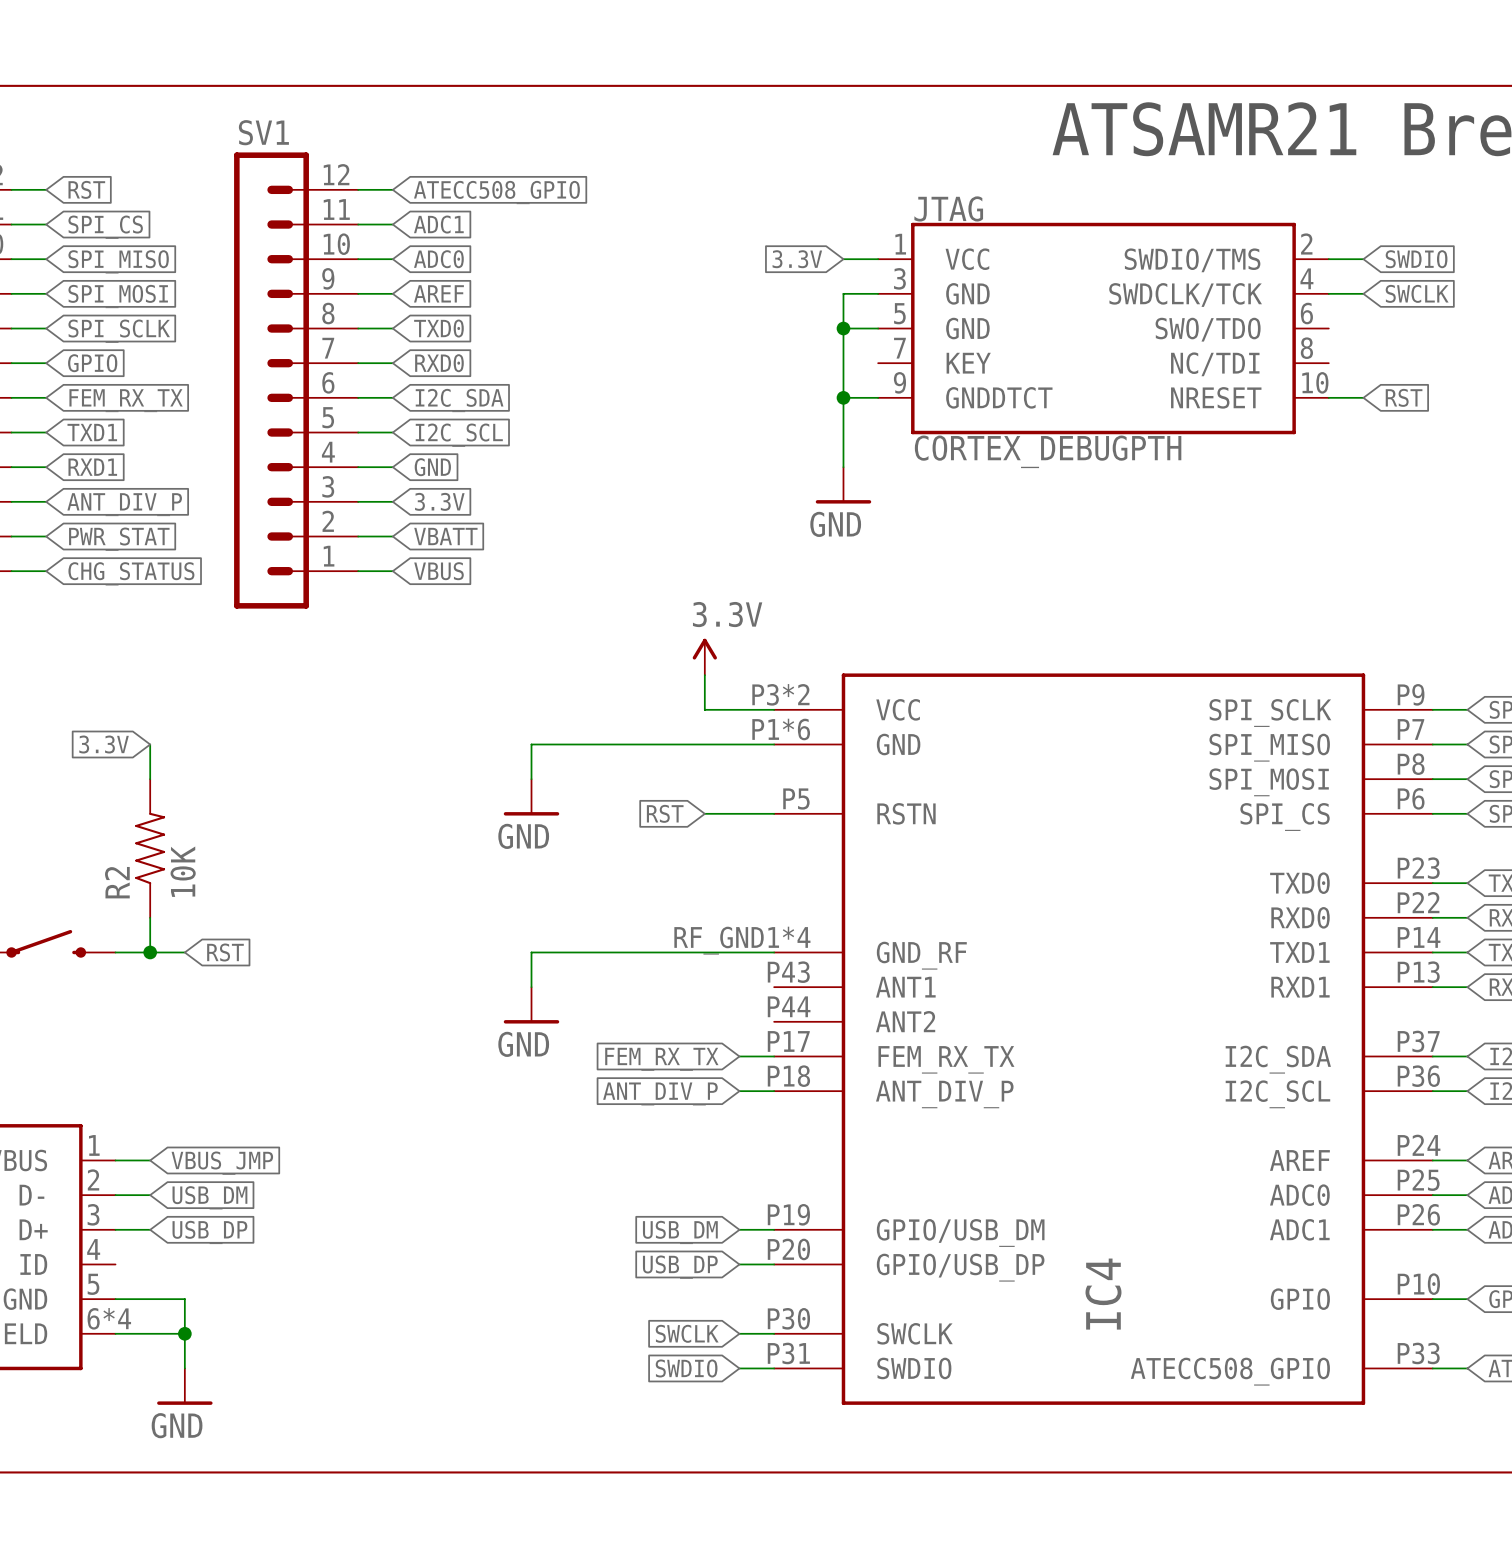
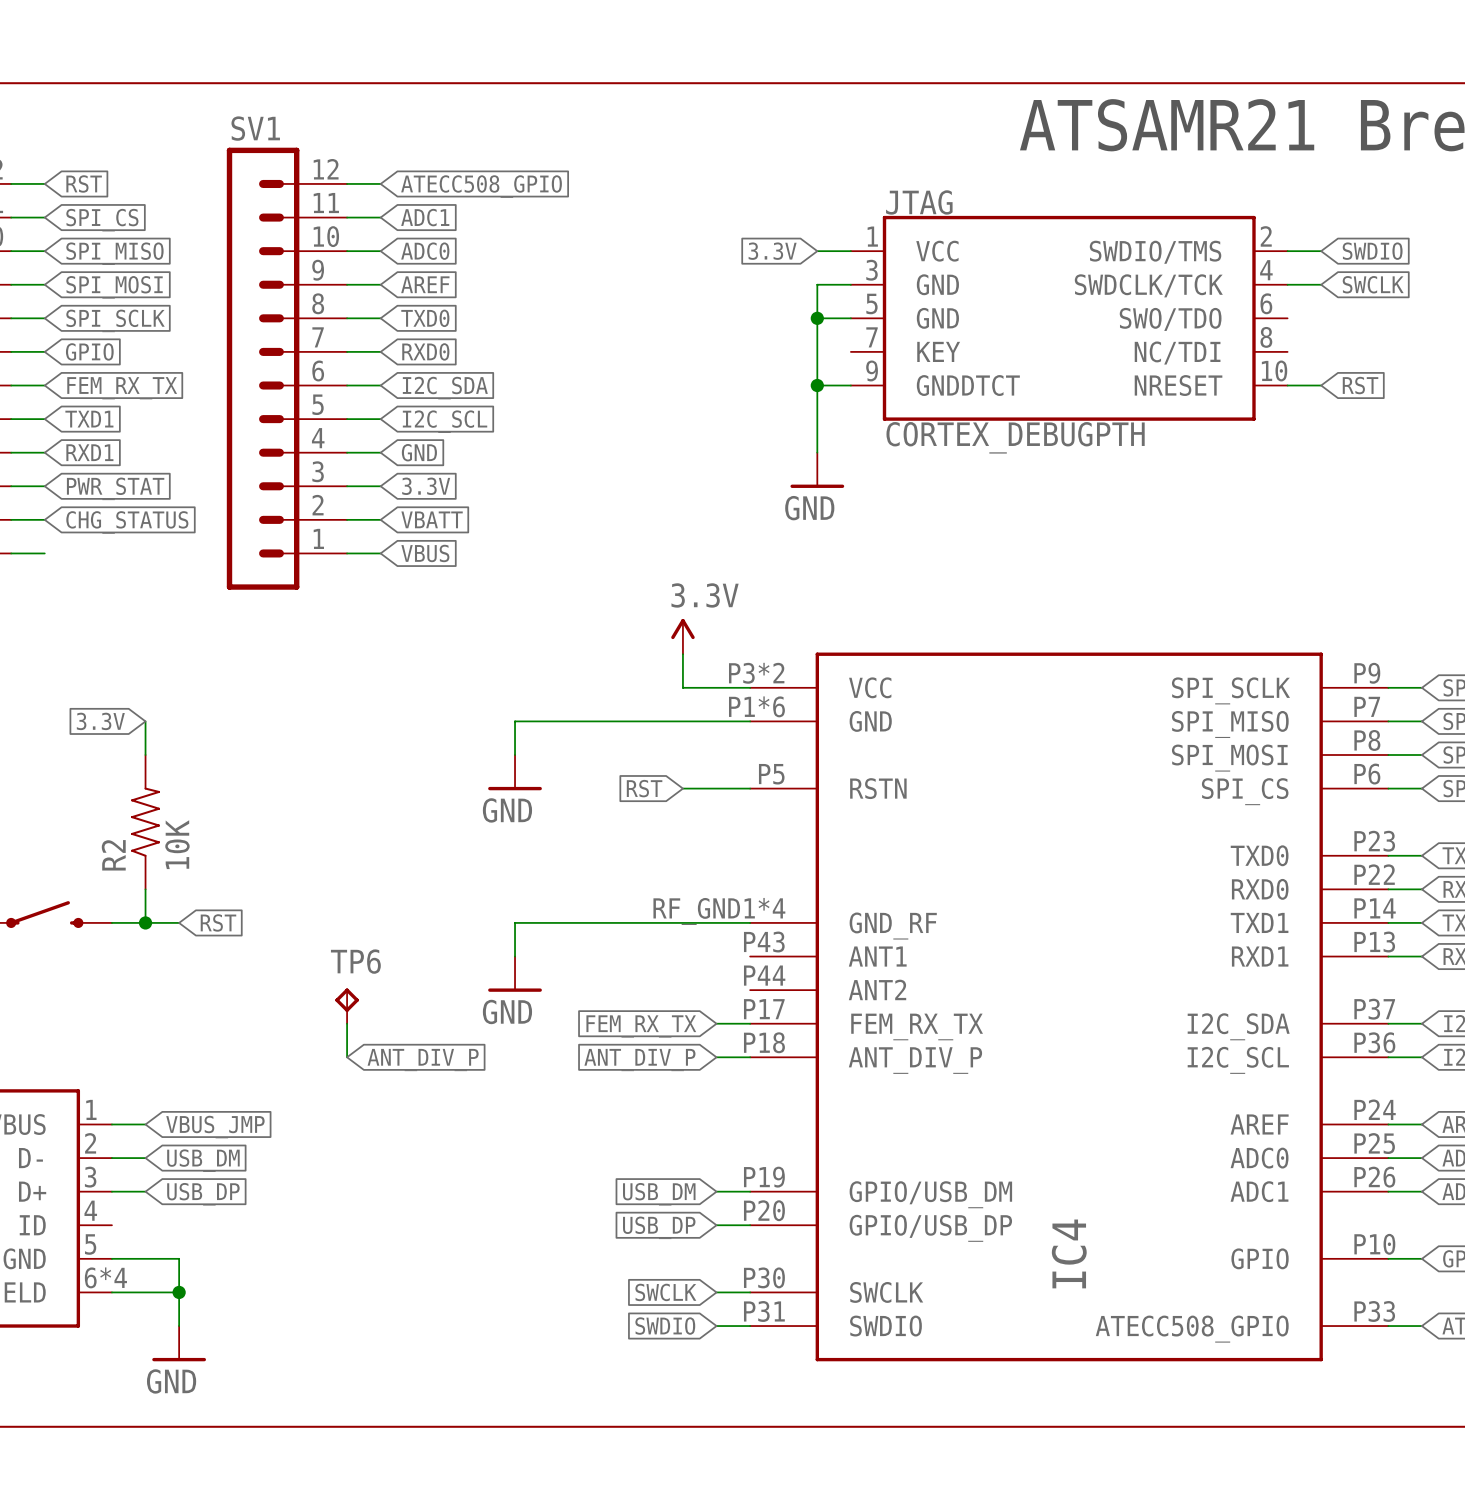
global label: ANT_DIV_P (124, 504) -> PWR_STAT (115, 488)
global label: PWR_STAT (119, 539) -> CHG_STATUS (127, 522)
global label: CHG_STATUS (131, 573) -> none
TP6: none -> (347, 1006)
wire: none -> (347, 1023) (347, 1057)
global label: none -> ANT_DIV_P (423, 1060)

